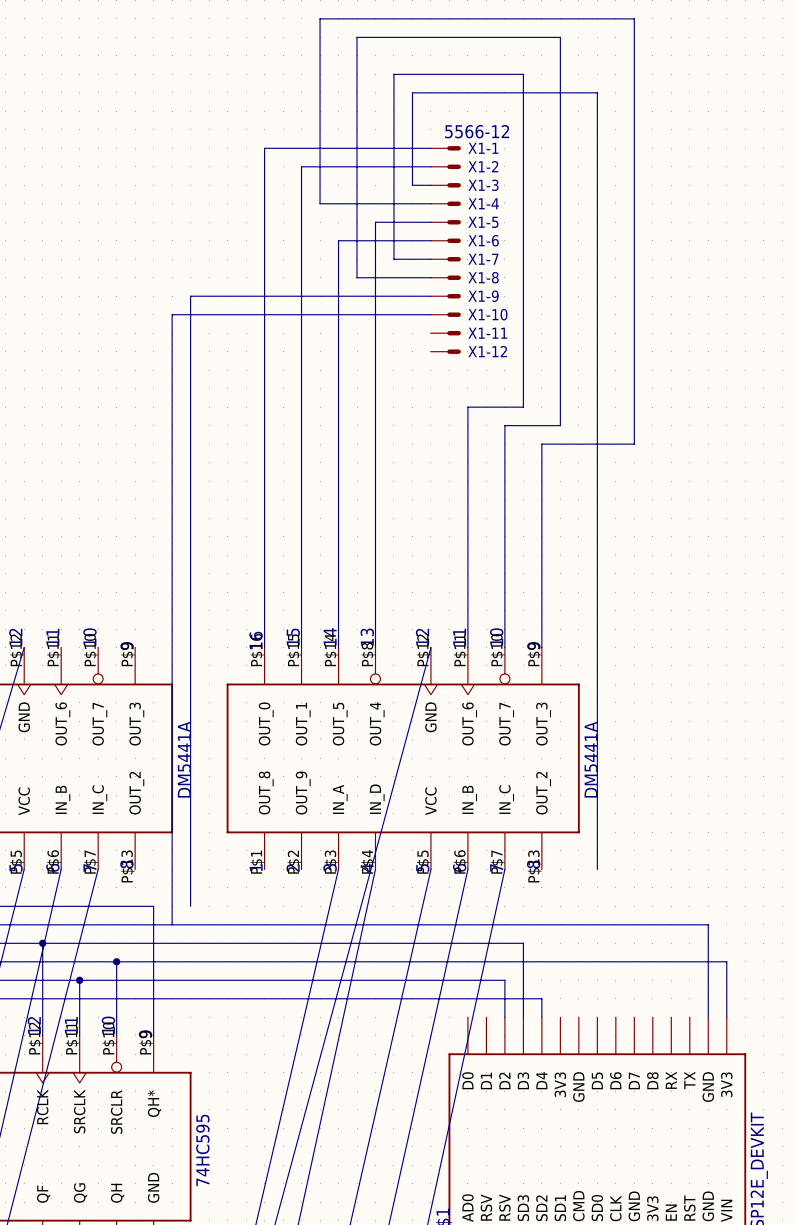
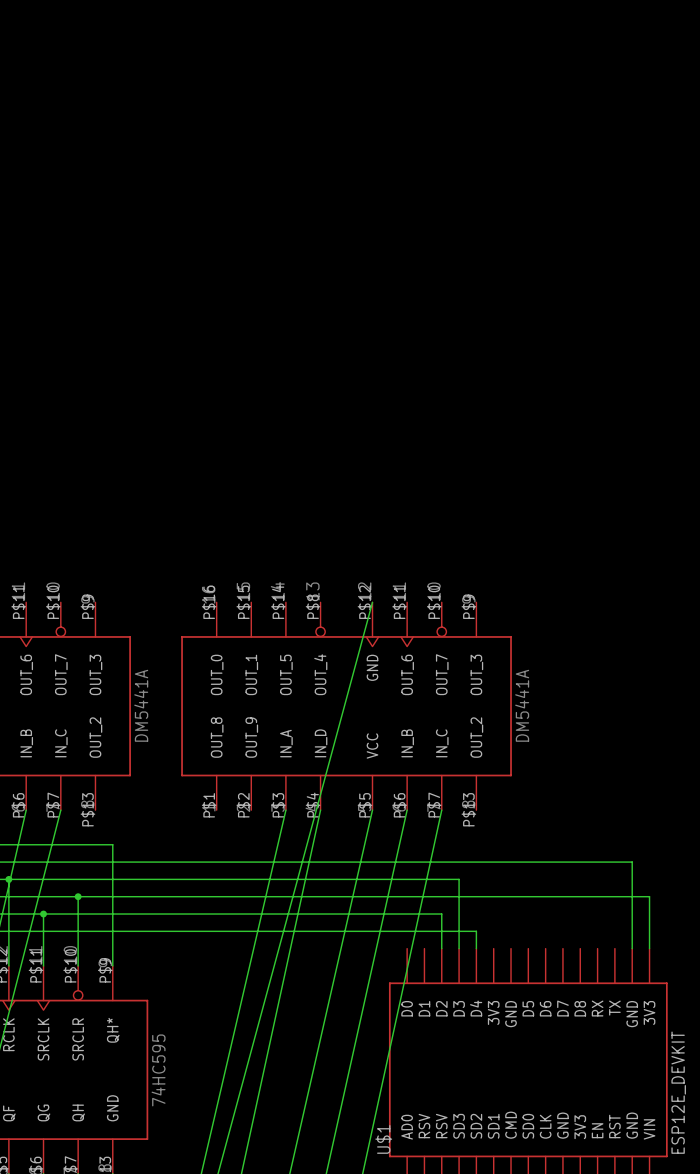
wire: (430, 148) (264, 148) (264, 647) -> none
X1-1: 5566-12 (445, 148) -> none
wire: (430, 166) (301, 166) (301, 647) -> none
X1-2: (445, 166) -> none
wire: (430, 185) (412, 185) (412, 92) (597, 92) (597, 869) -> none
X1-3: (445, 185) -> none
wire: (430, 203) (320, 203) (320, 18) (634, 18) (634, 444) (541, 444) (541, 647) -> none
X1-4: (445, 203) -> none
wire: (430, 222) (375, 222) (375, 647) -> none
X1-5: (445, 222) -> none
wire: (430, 240) (338, 240) (338, 647) -> none
X1-6: (445, 240) -> none
wire: (430, 259) (393, 259) (393, 74) (523, 74) (523, 407) (467, 407) (467, 647) -> none
X1-7: (445, 259) -> none
wire: (430, 277) (357, 277) (357, 37) (560, 37) (560, 425) (504, 425) (504, 647) -> none
X1-8: (445, 277) -> none
wire: (430, 296) (190, 296) (190, 906) -> none
X1-9: (445, 296) -> none
wire: (430, 314) (172, 314) (172, 924) -> none
X1-10: (445, 314) -> none
X1-11: (445, 333) -> none
X1-12: (445, 351) -> none

